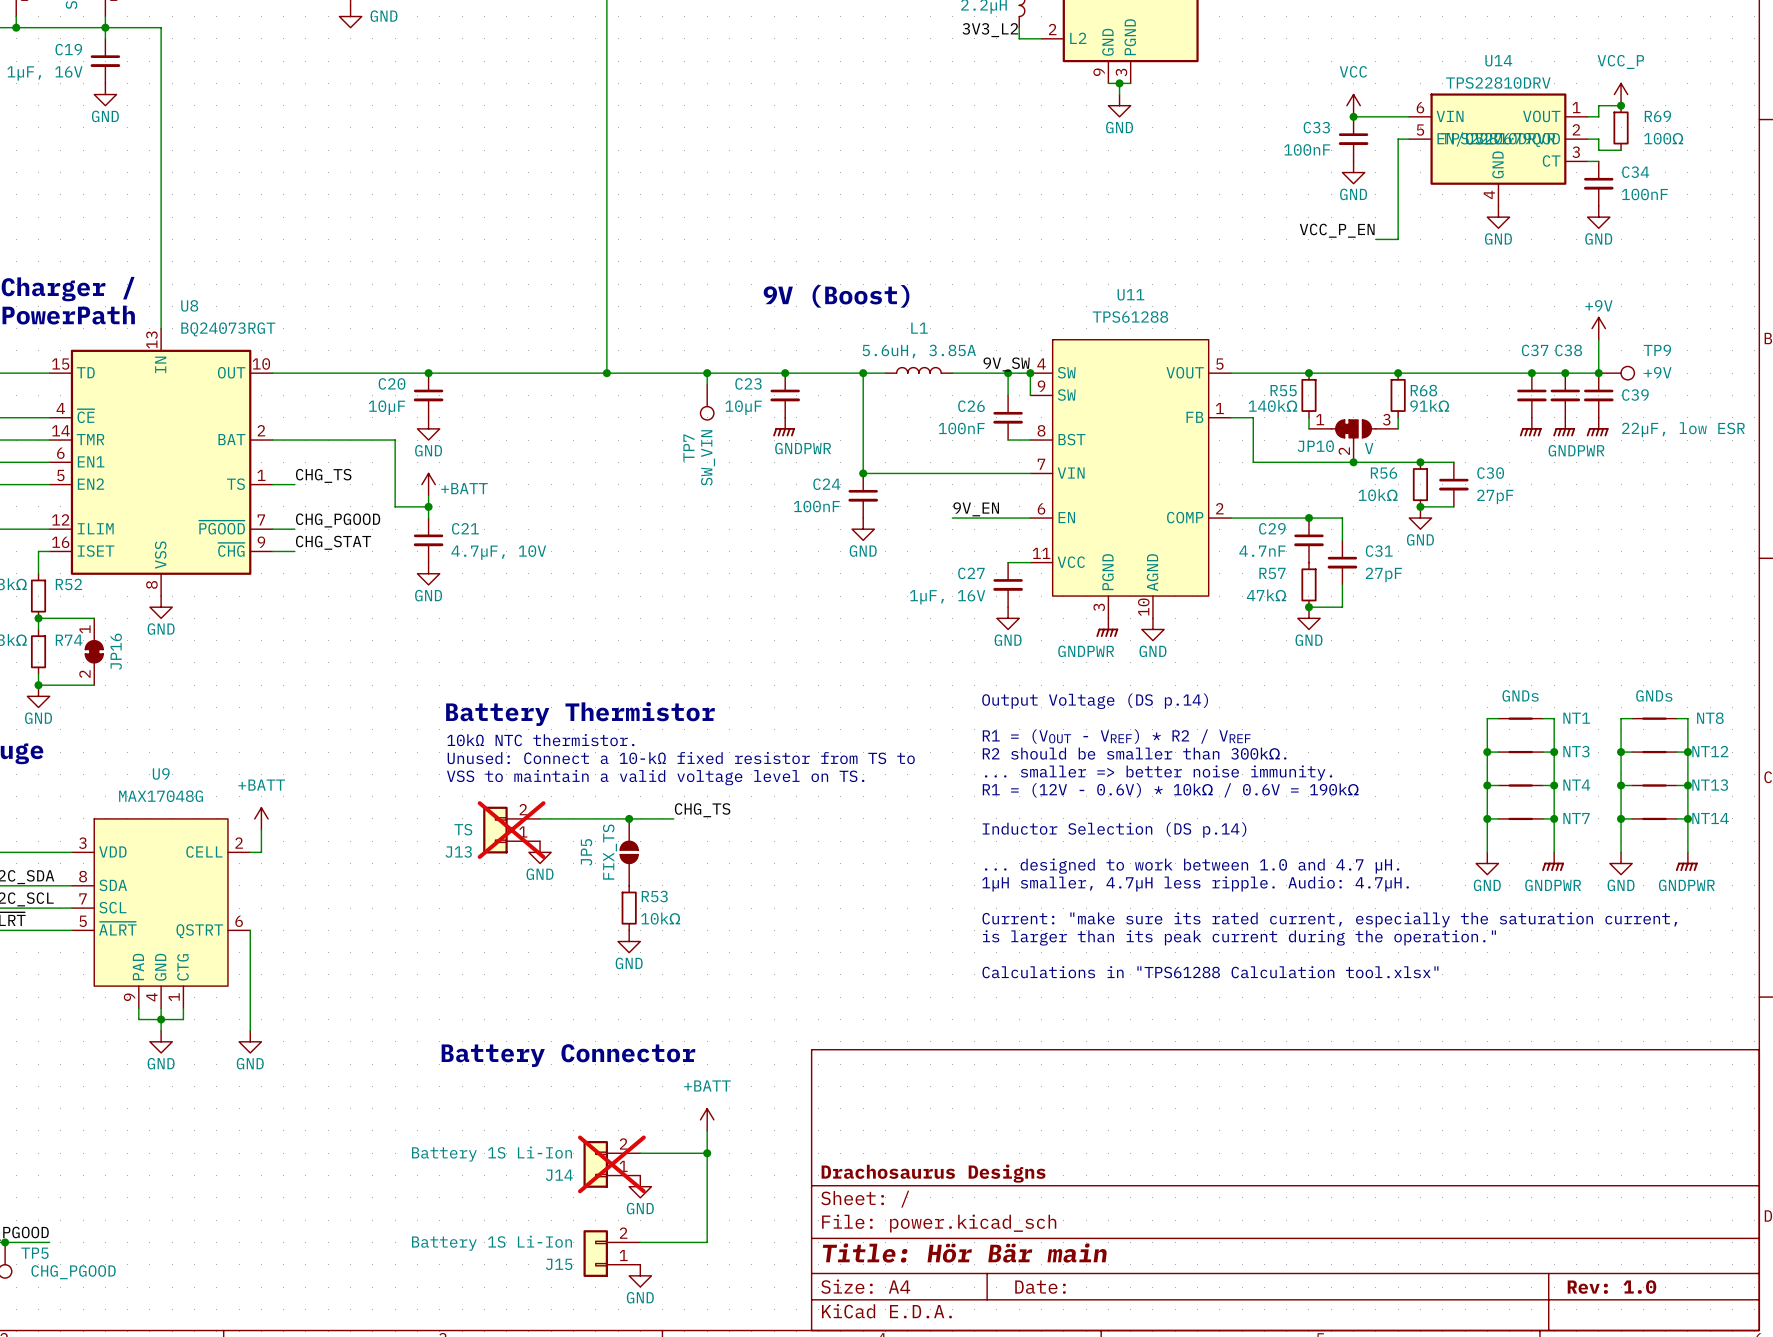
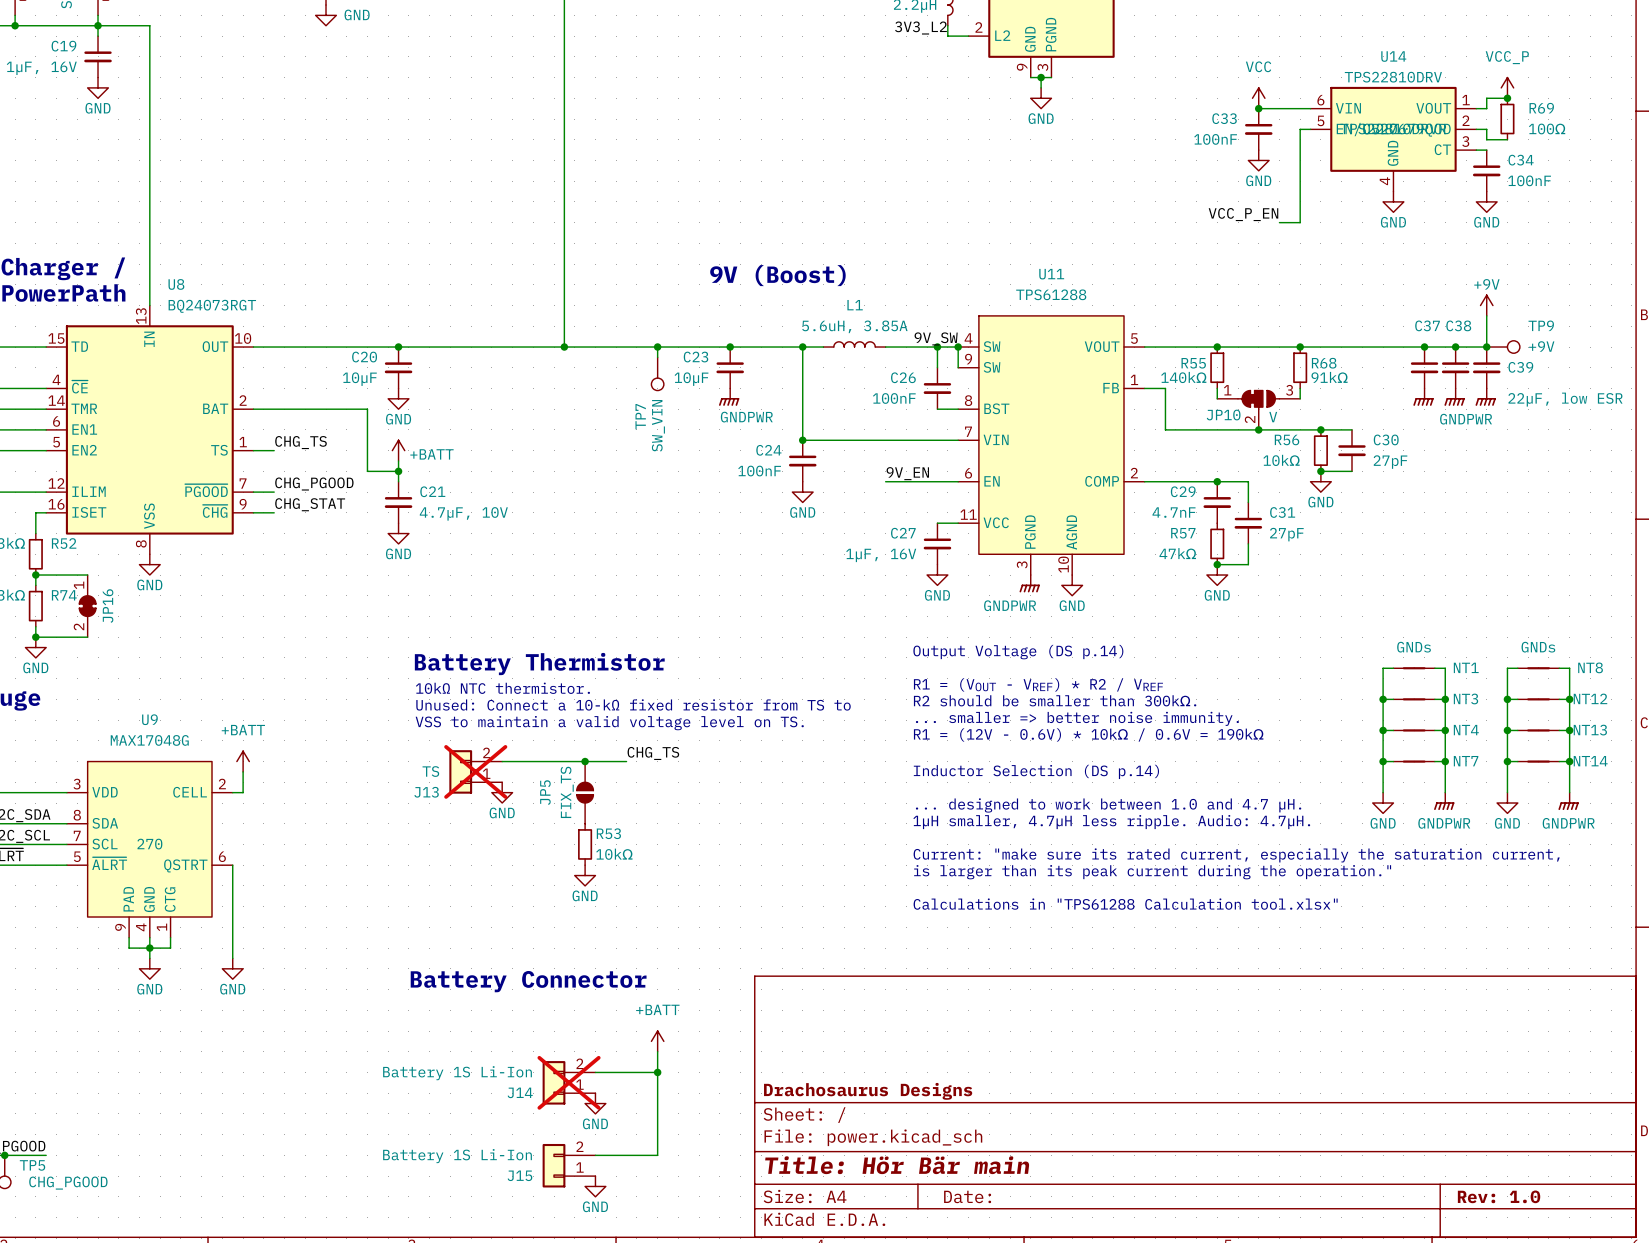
U9 text: none -> 270 (149, 844)

